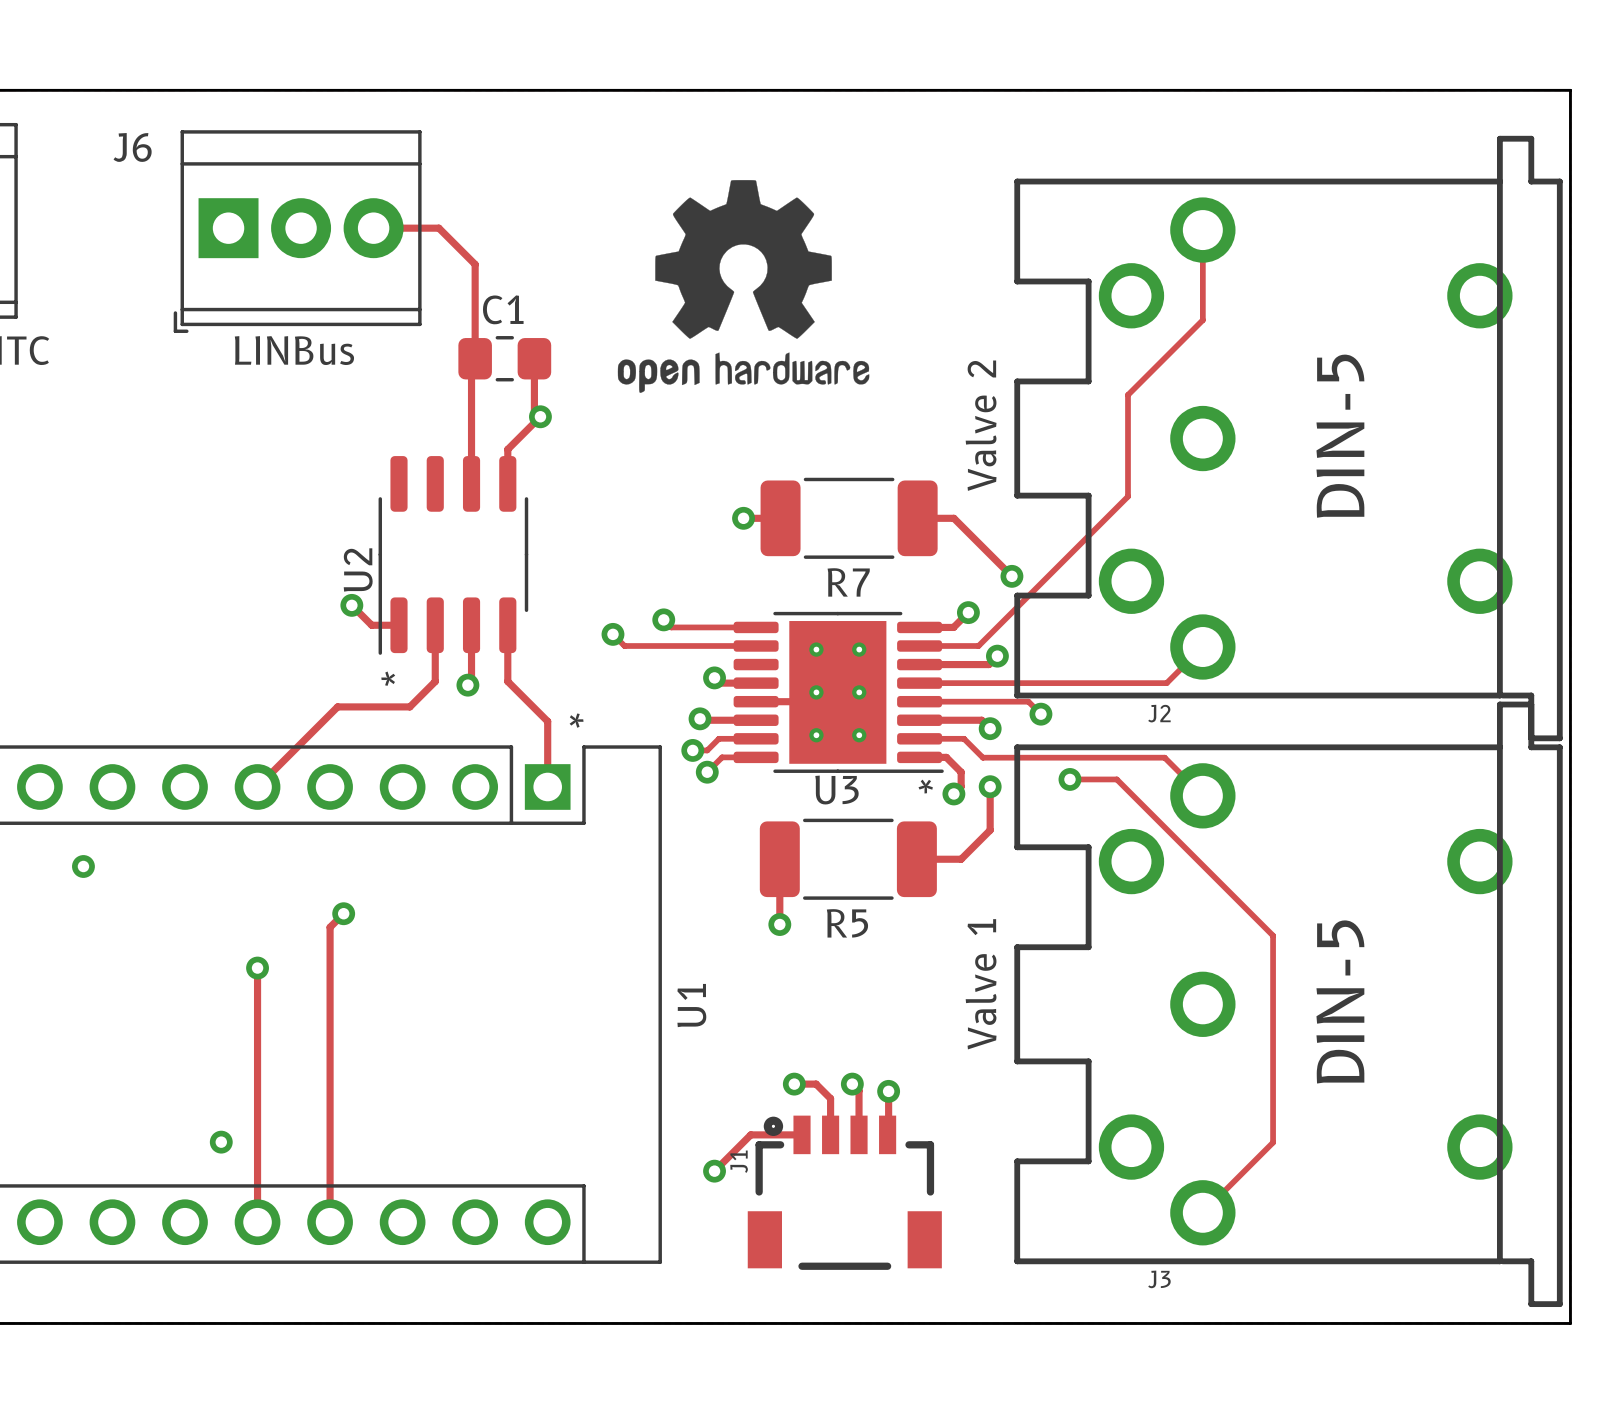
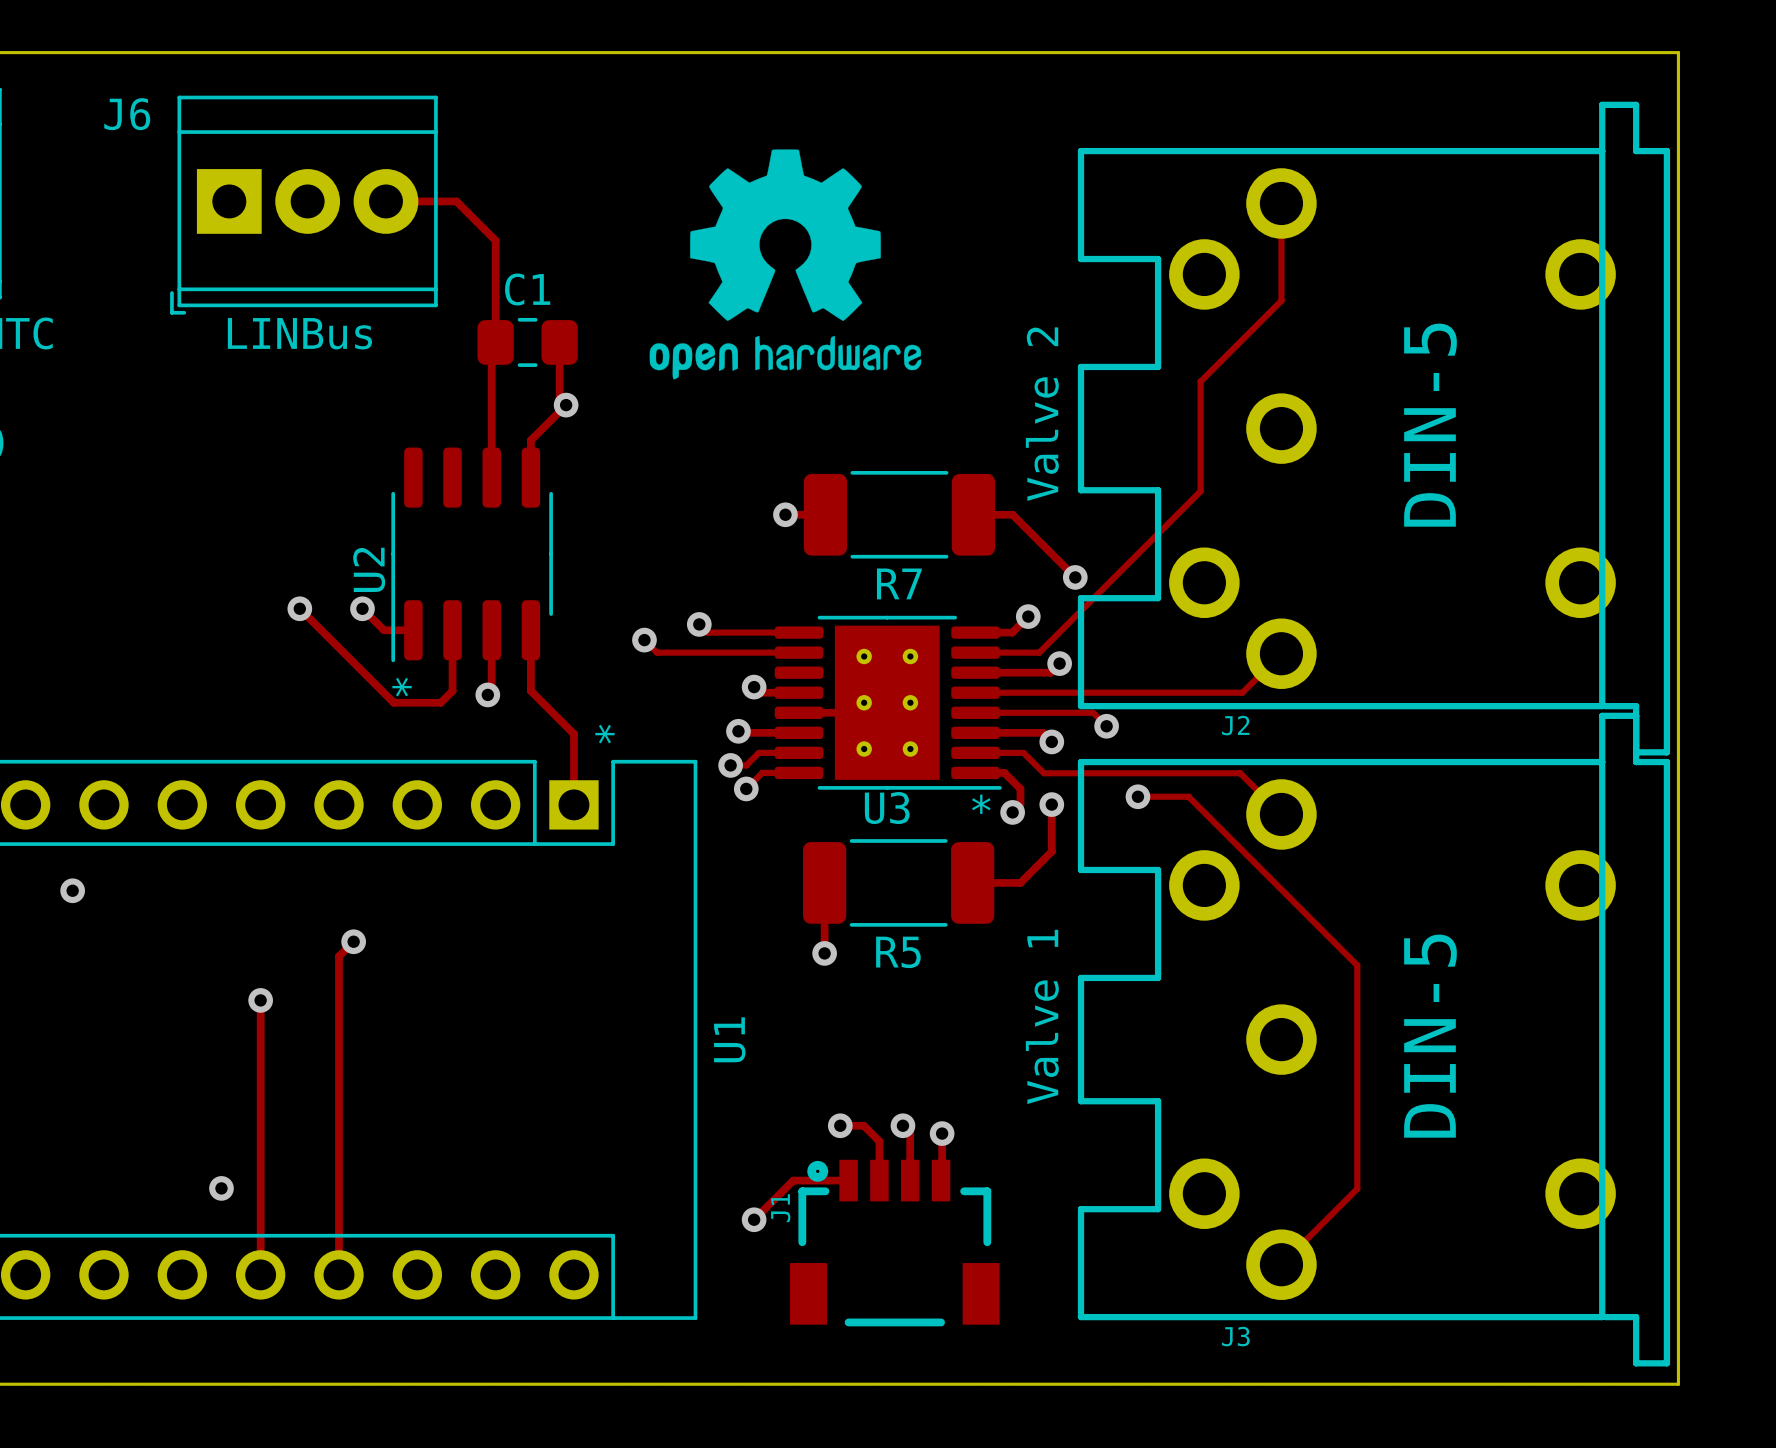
via: none -> (299, 608)
track: (424, 692) (409, 706) (337, 706) (257, 786) -> (440, 702) (393, 702) (299, 608)

